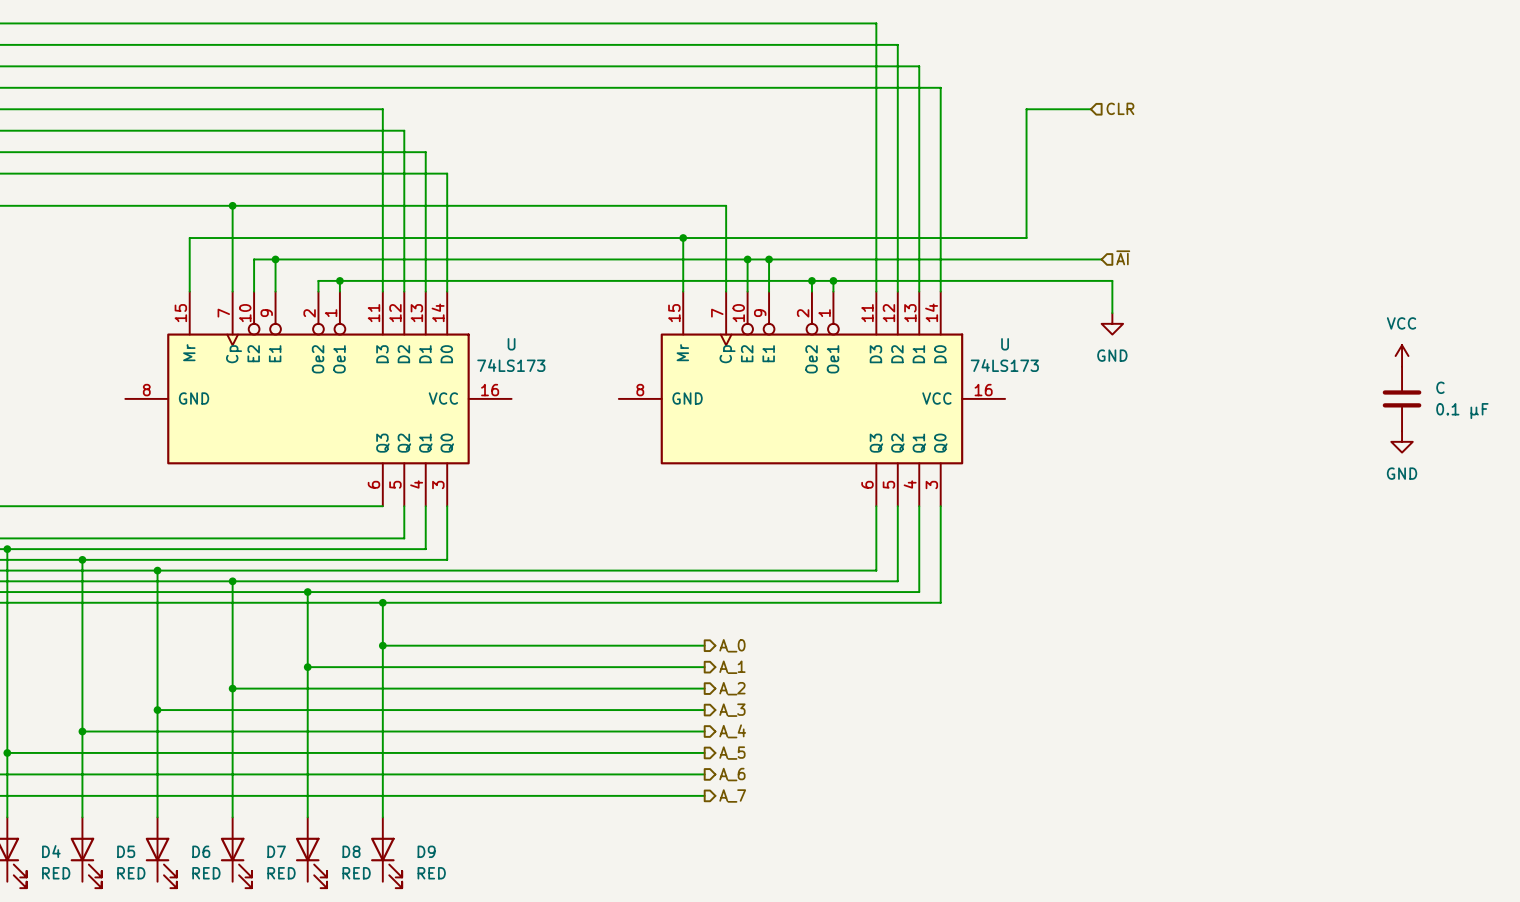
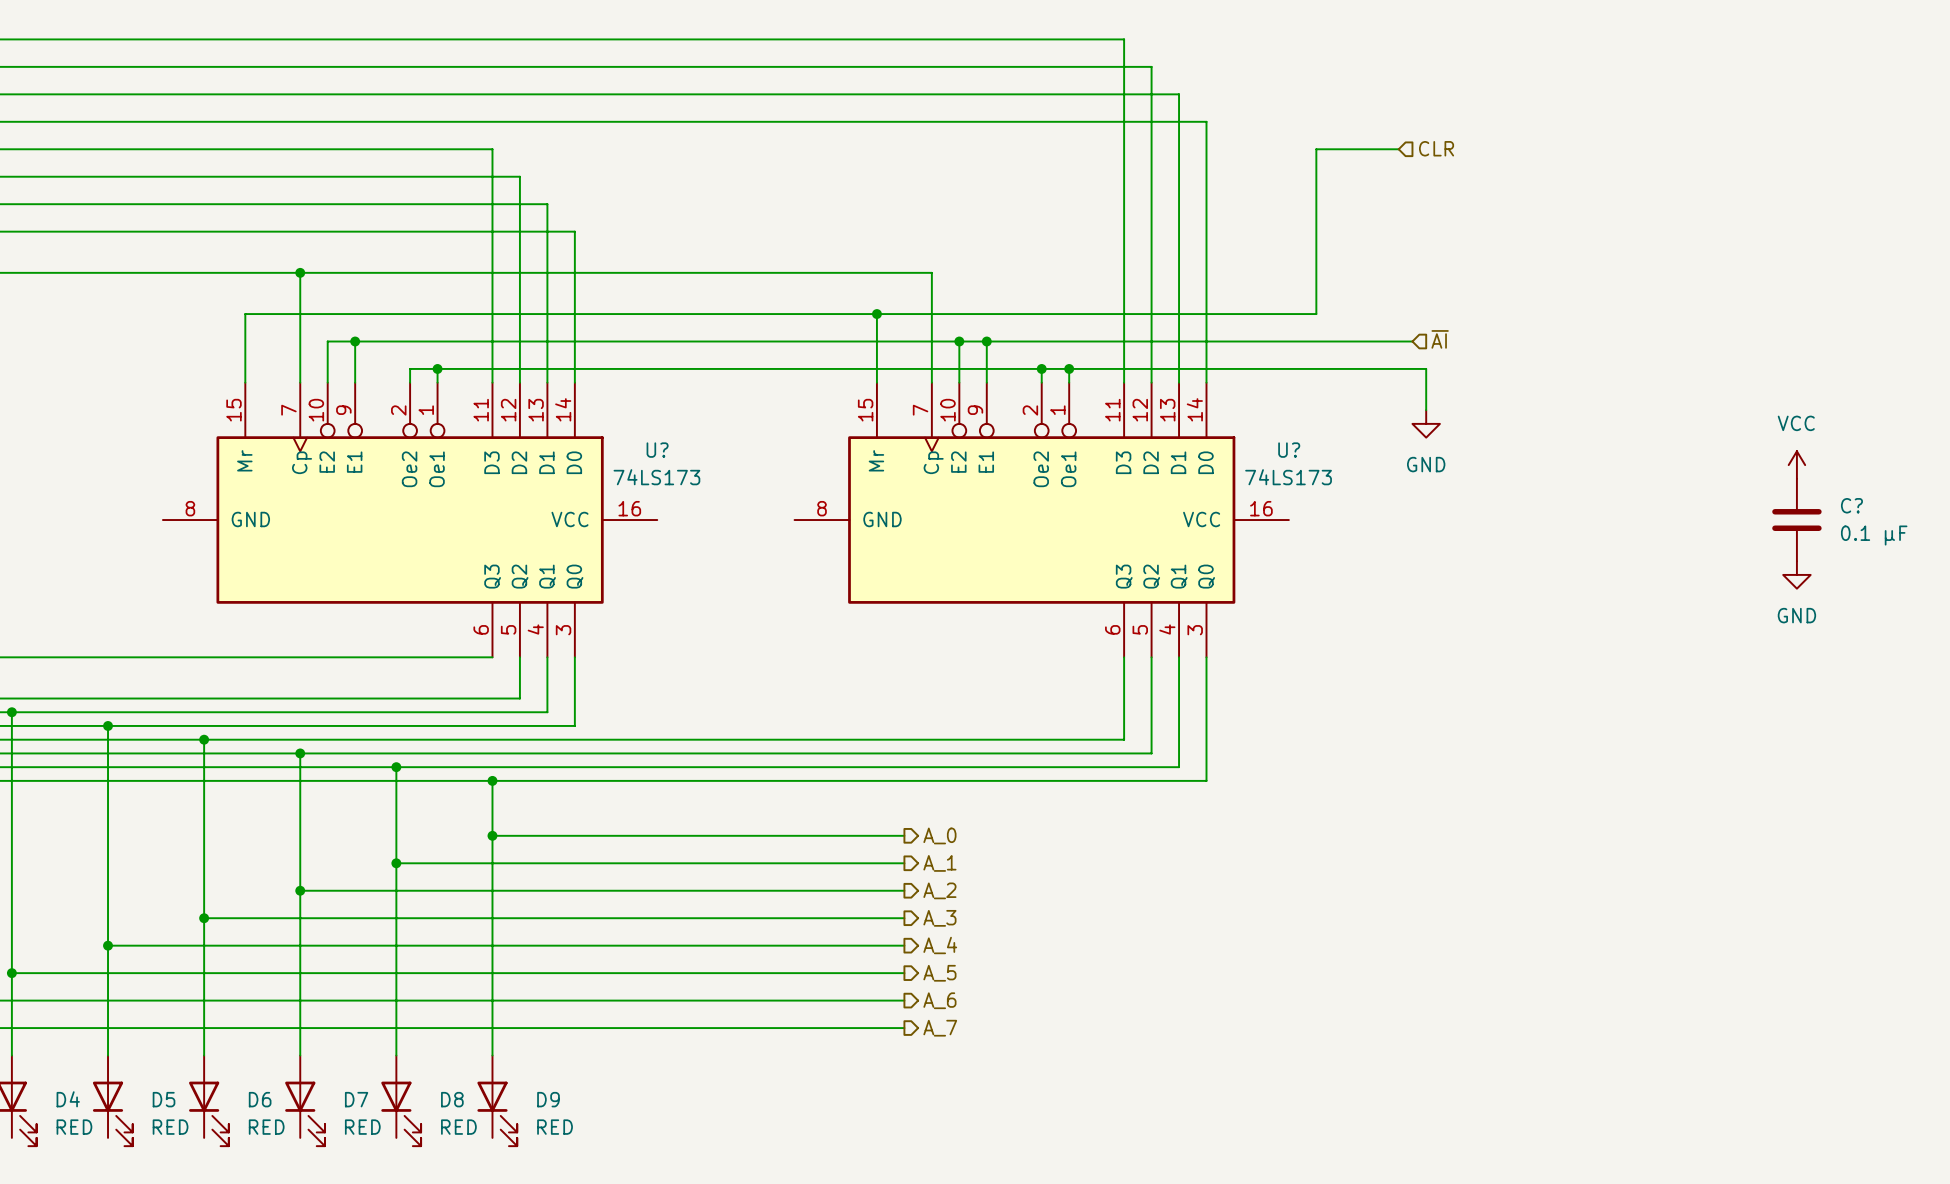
U name: U (511, 344) -> U? (657, 450)
U name: U (1005, 344) -> U? (1289, 450)
C name: C (1440, 387) -> C? (1851, 505)

